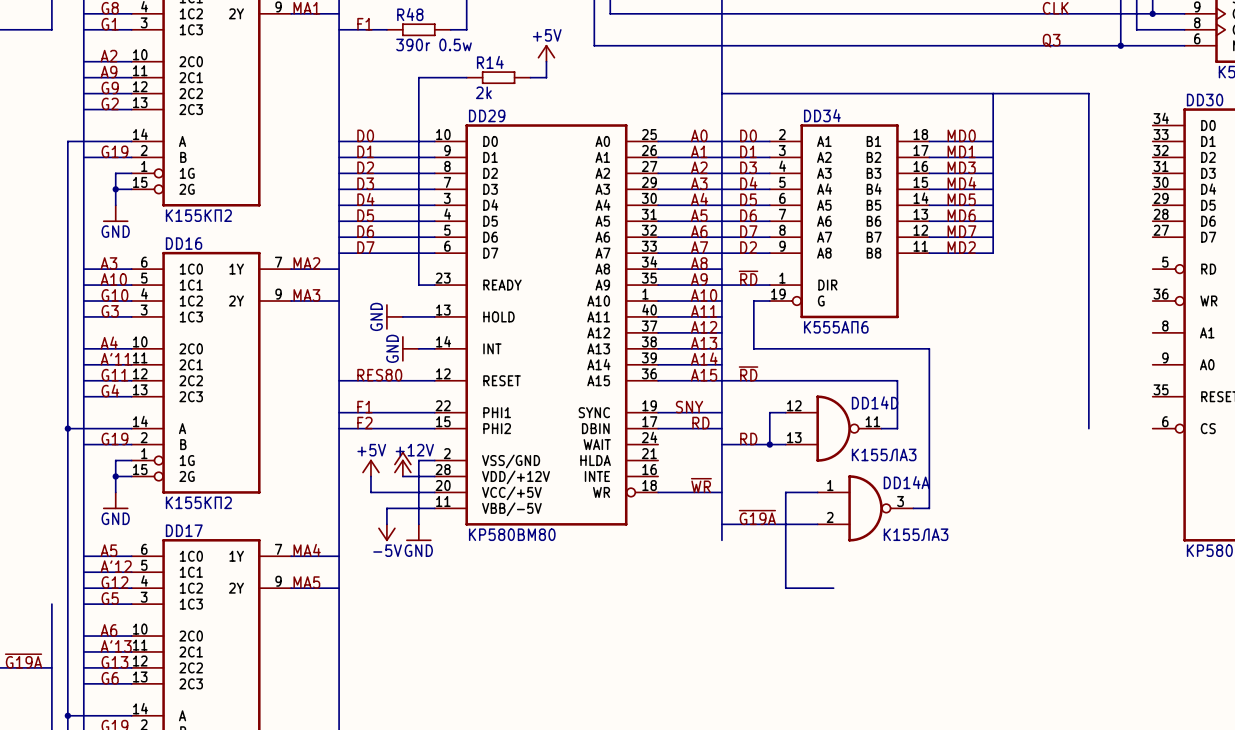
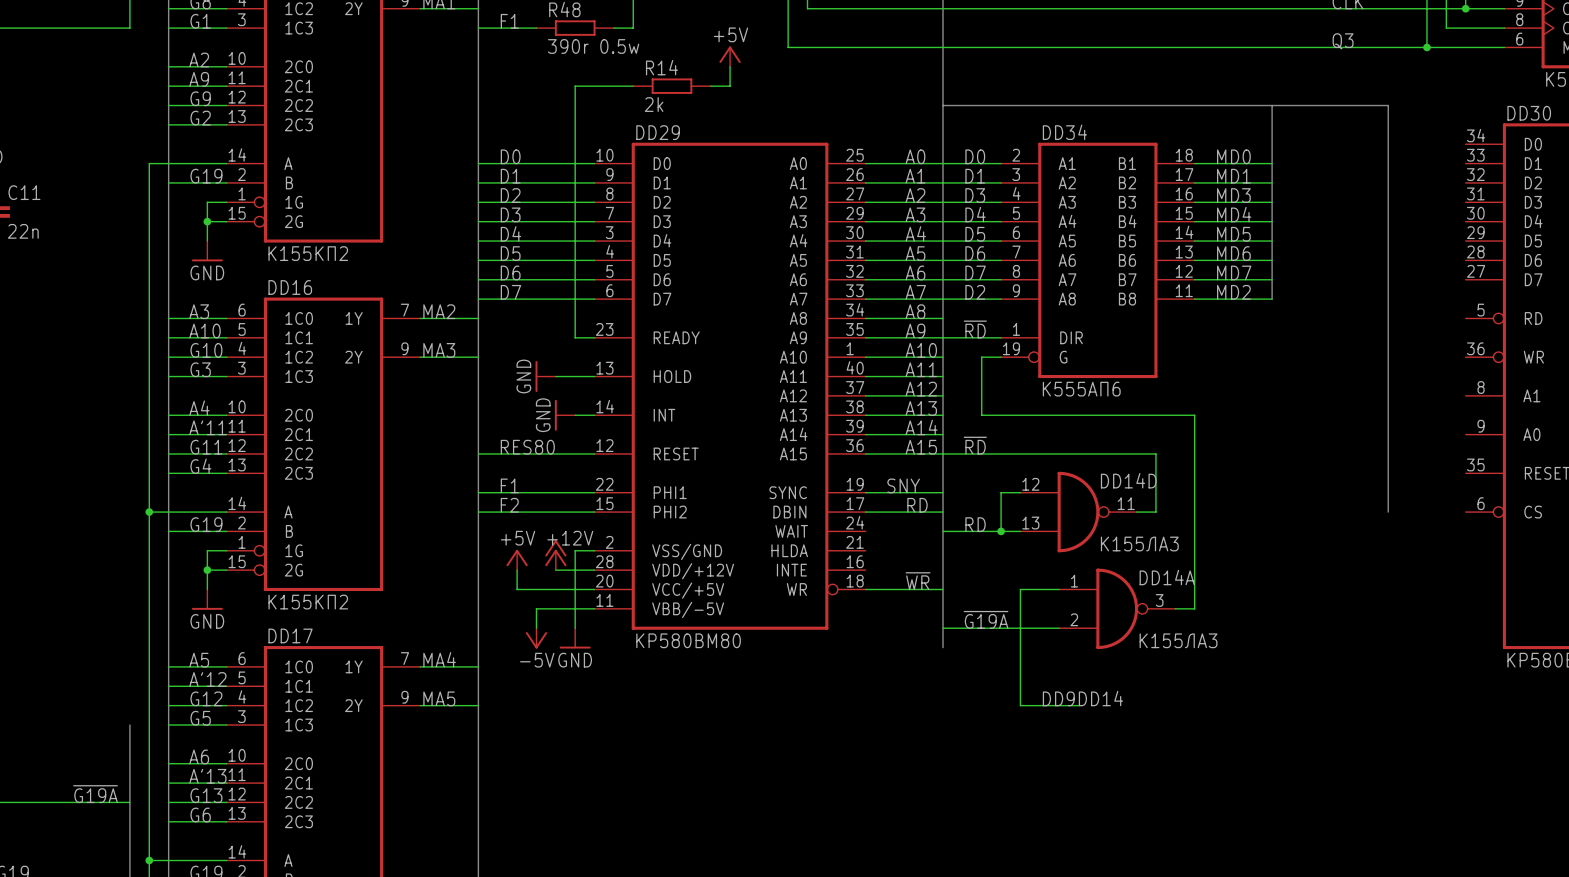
label: none -> DD9DD14 (1082, 698)

